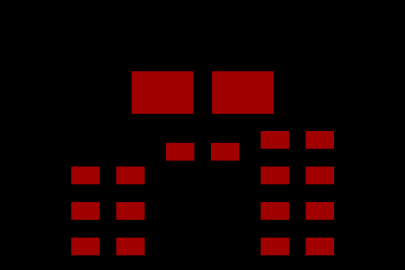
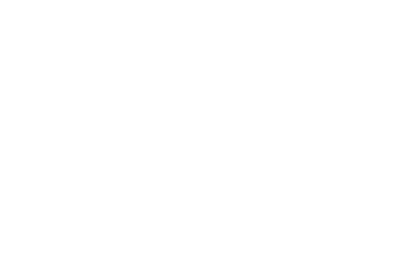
part: (202, 92) -> none
part: (297, 139) -> none
part: (202, 151) -> none
part: (107, 175) -> none
part: (297, 175) -> none
part: (107, 210) -> none
part: (297, 210) -> none
part: (107, 246) -> none
part: (297, 246) -> none

